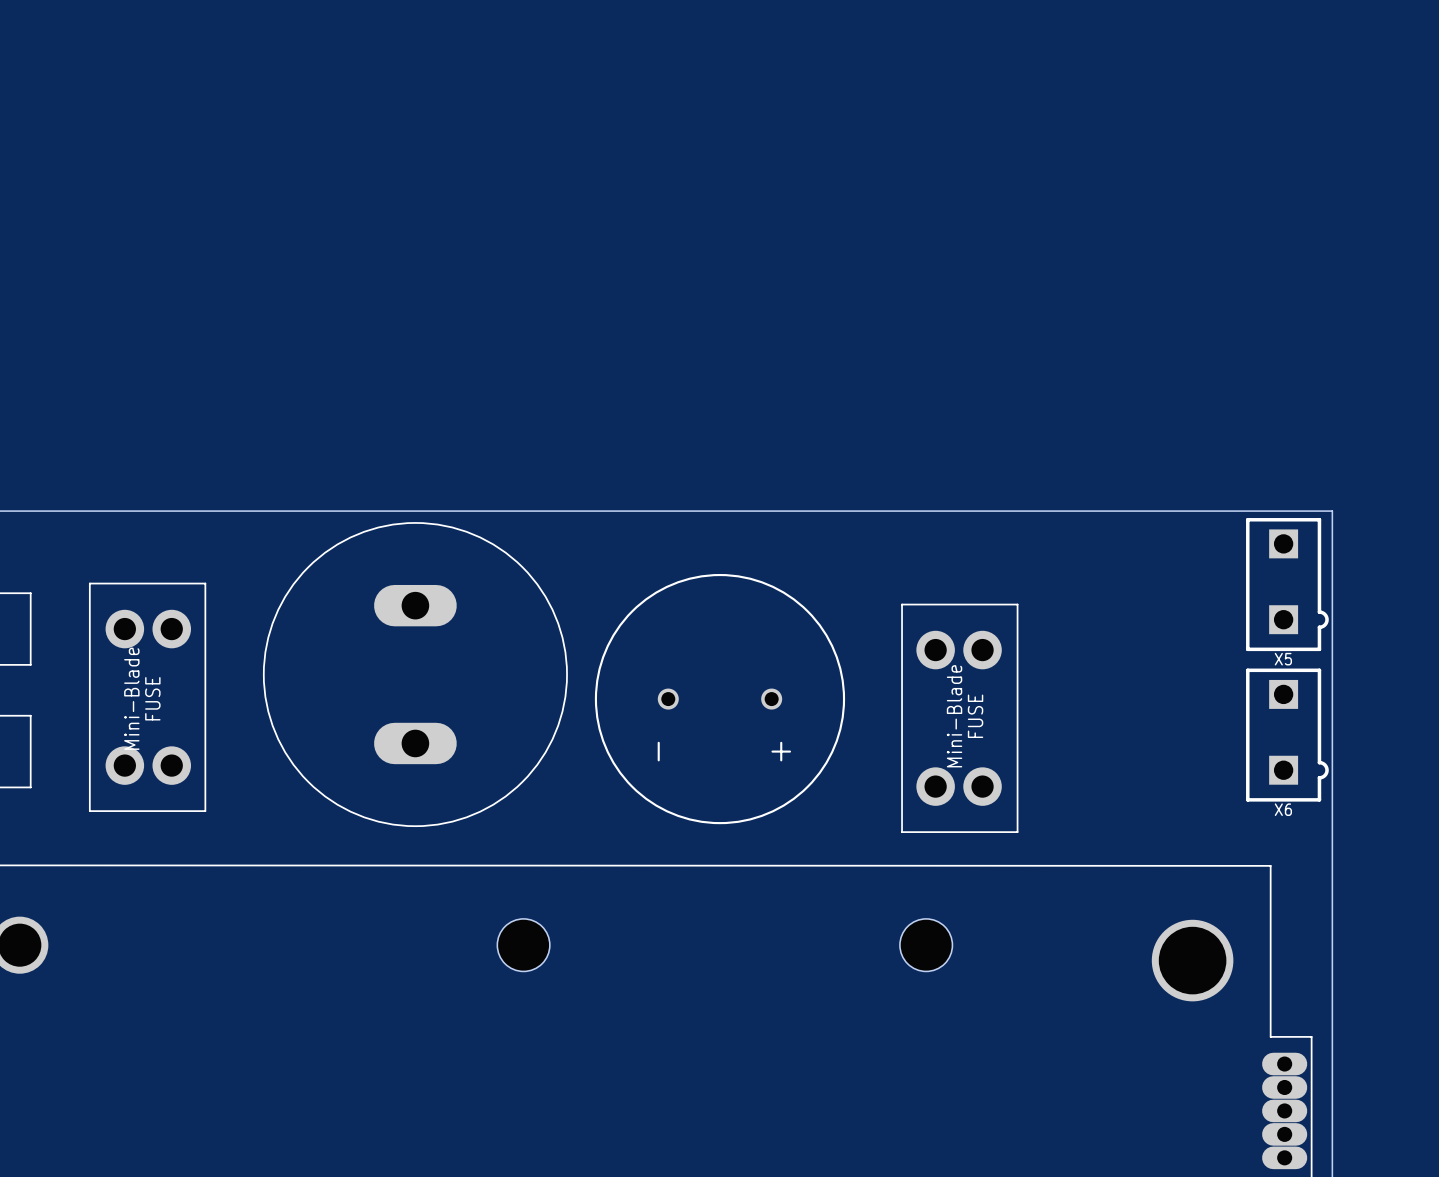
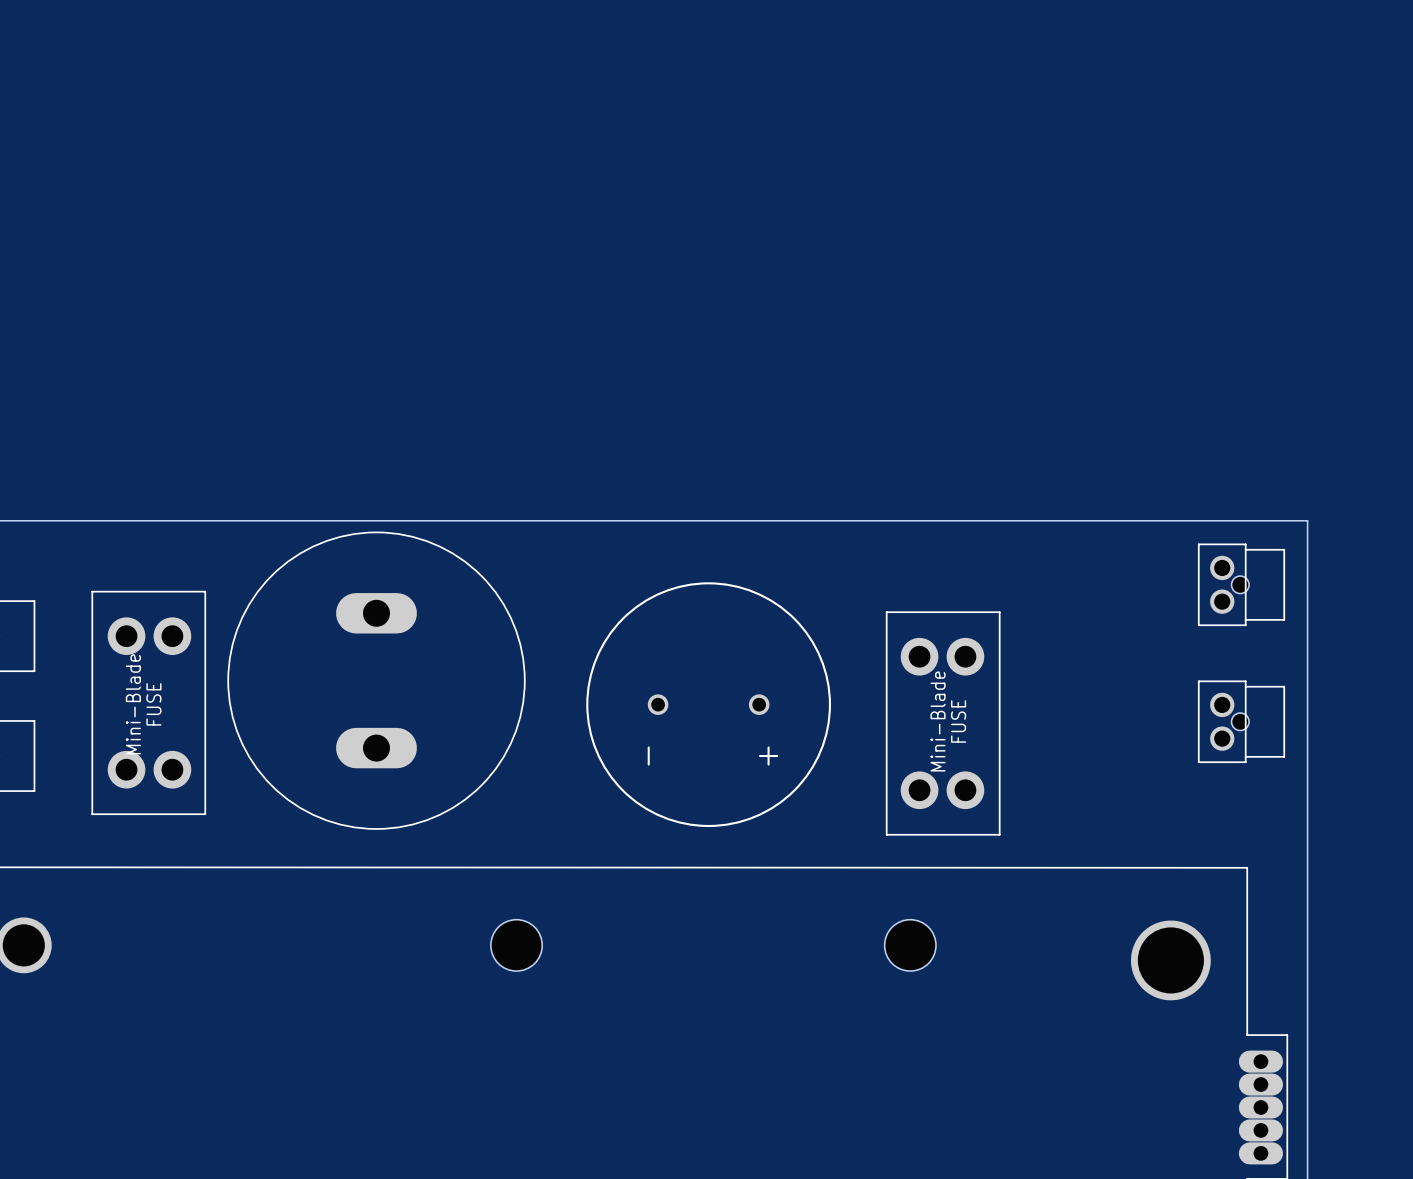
part: none -> (1241, 584)
X5: (1287, 584) -> none
part position: (415, 674) -> (376, 680)
part: none -> (1241, 721)
X6: (1287, 735) -> none

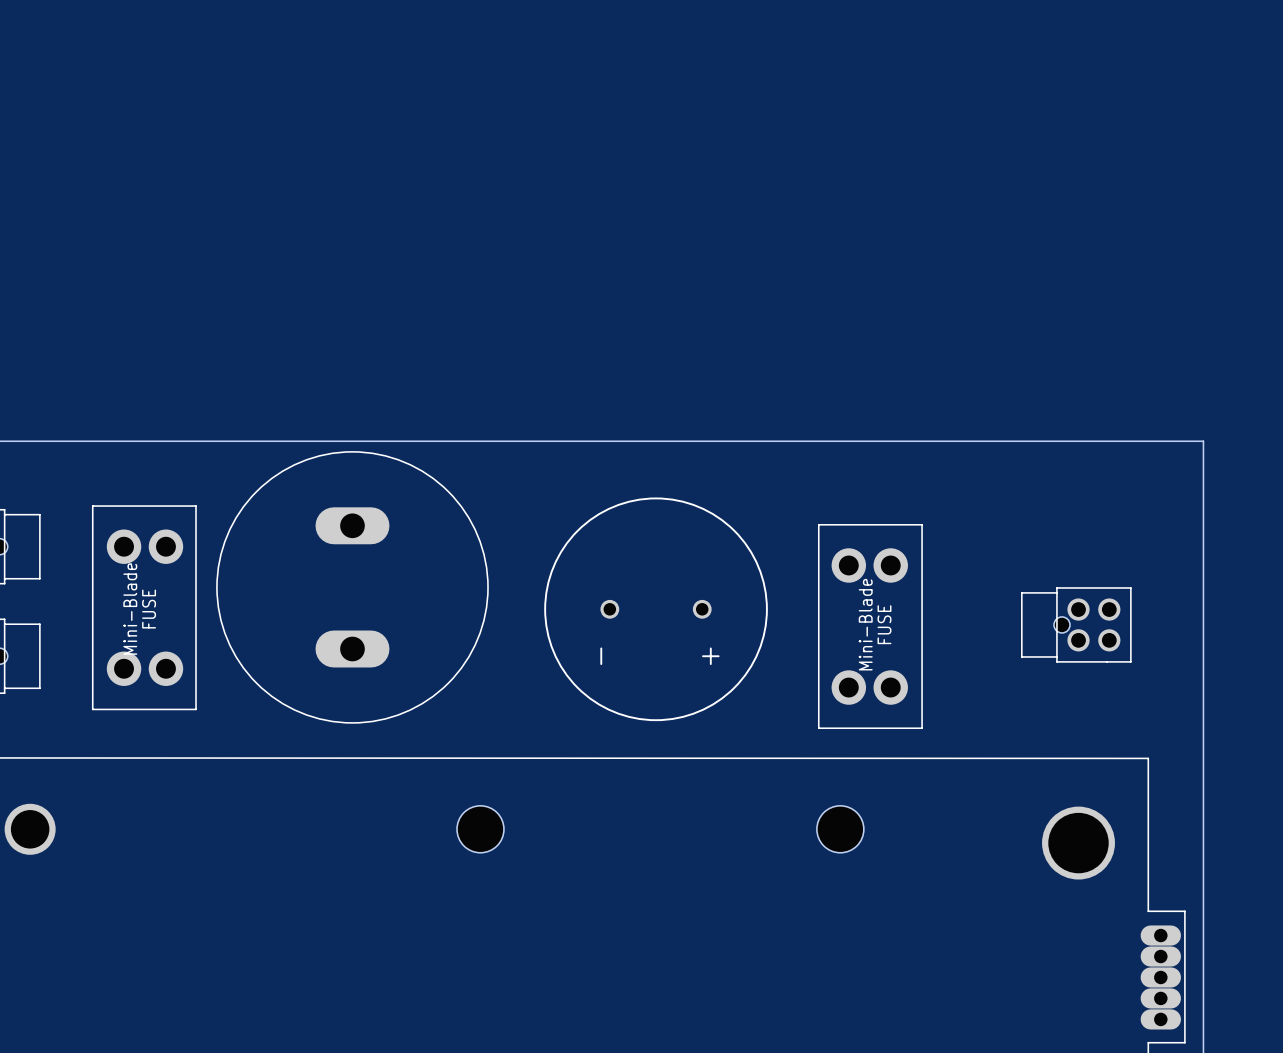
part: (1241, 584) -> none
part: none -> (1076, 624)
part: (1241, 721) -> none

